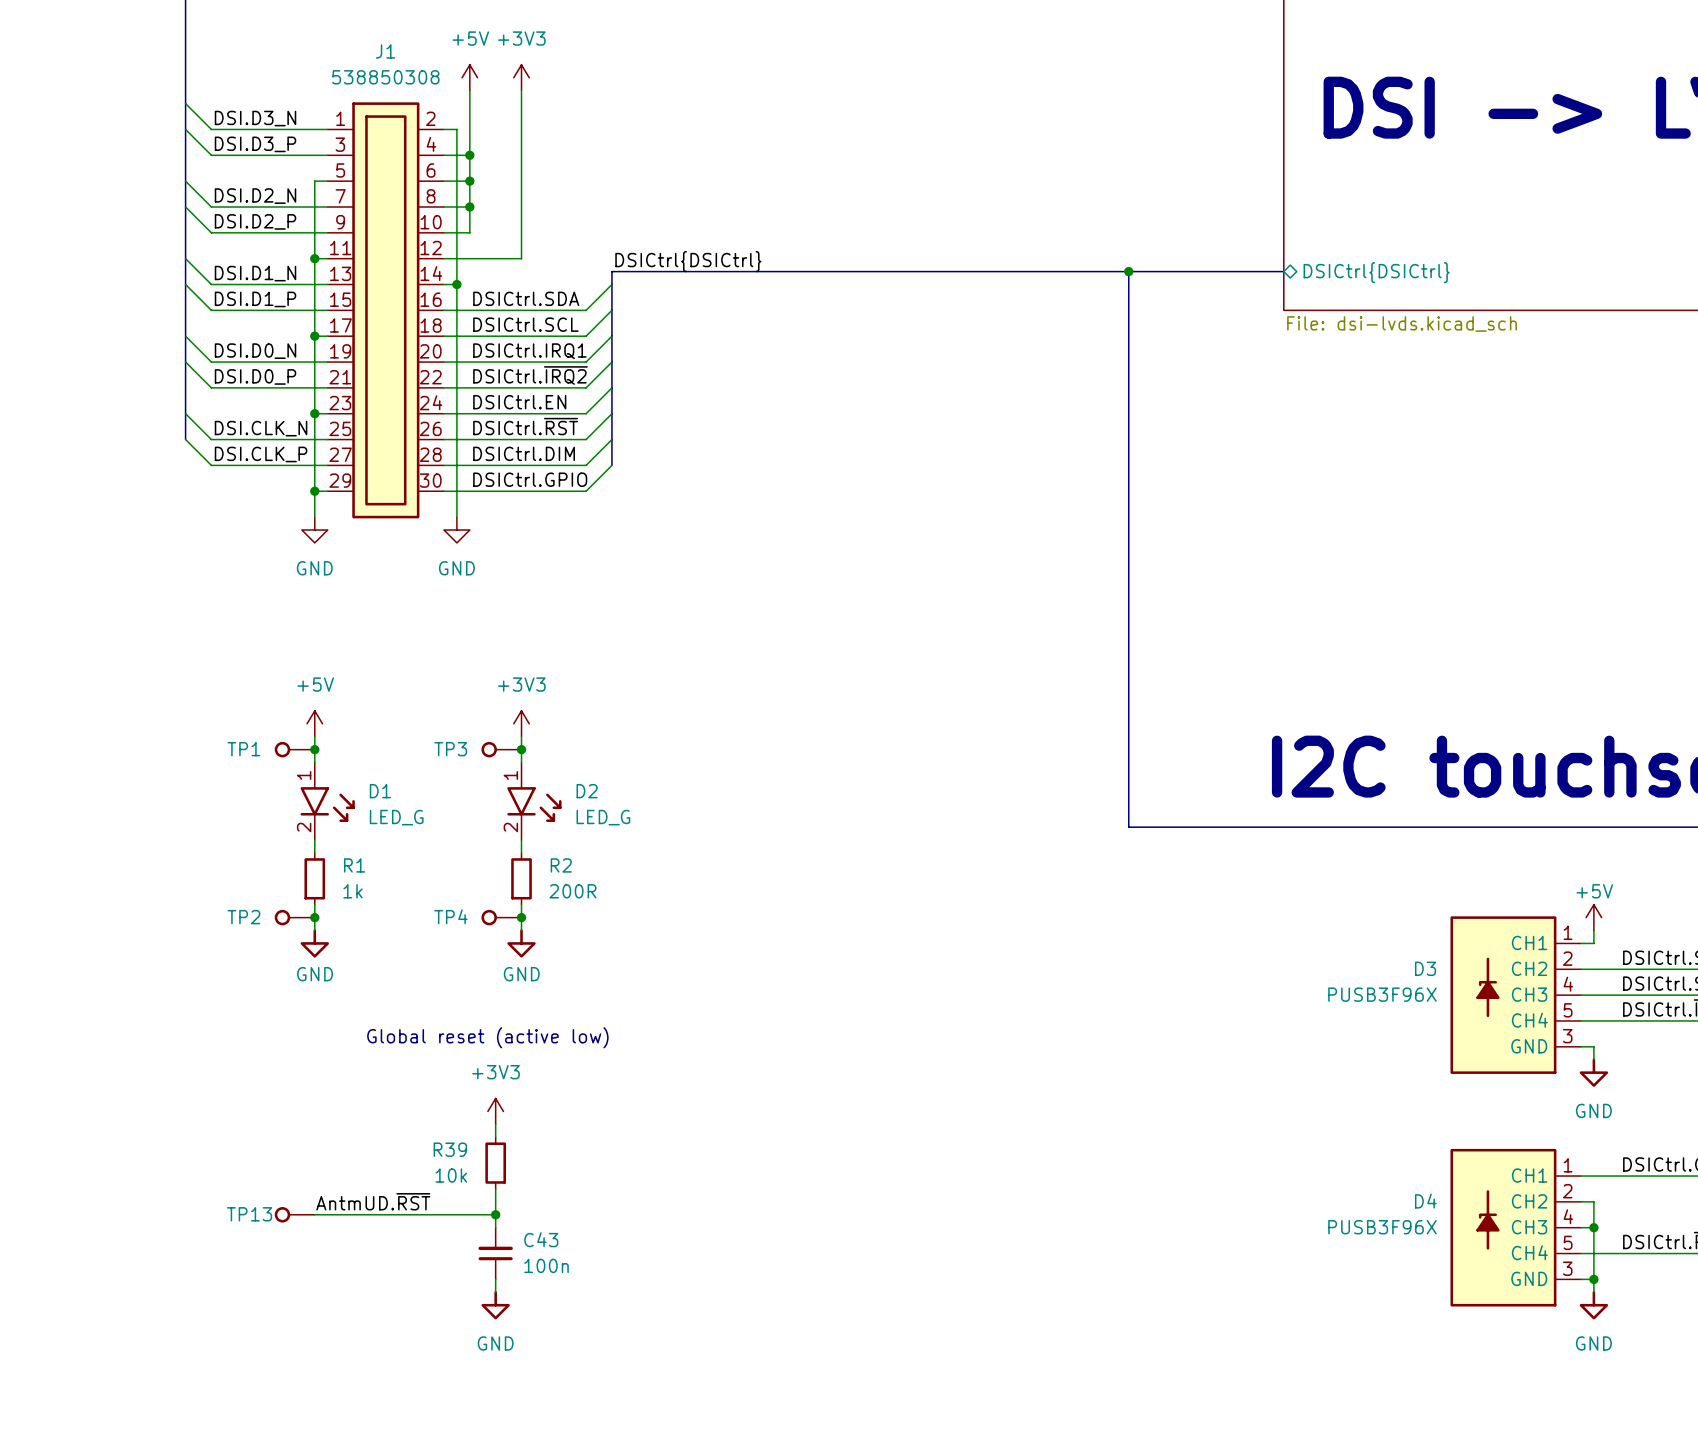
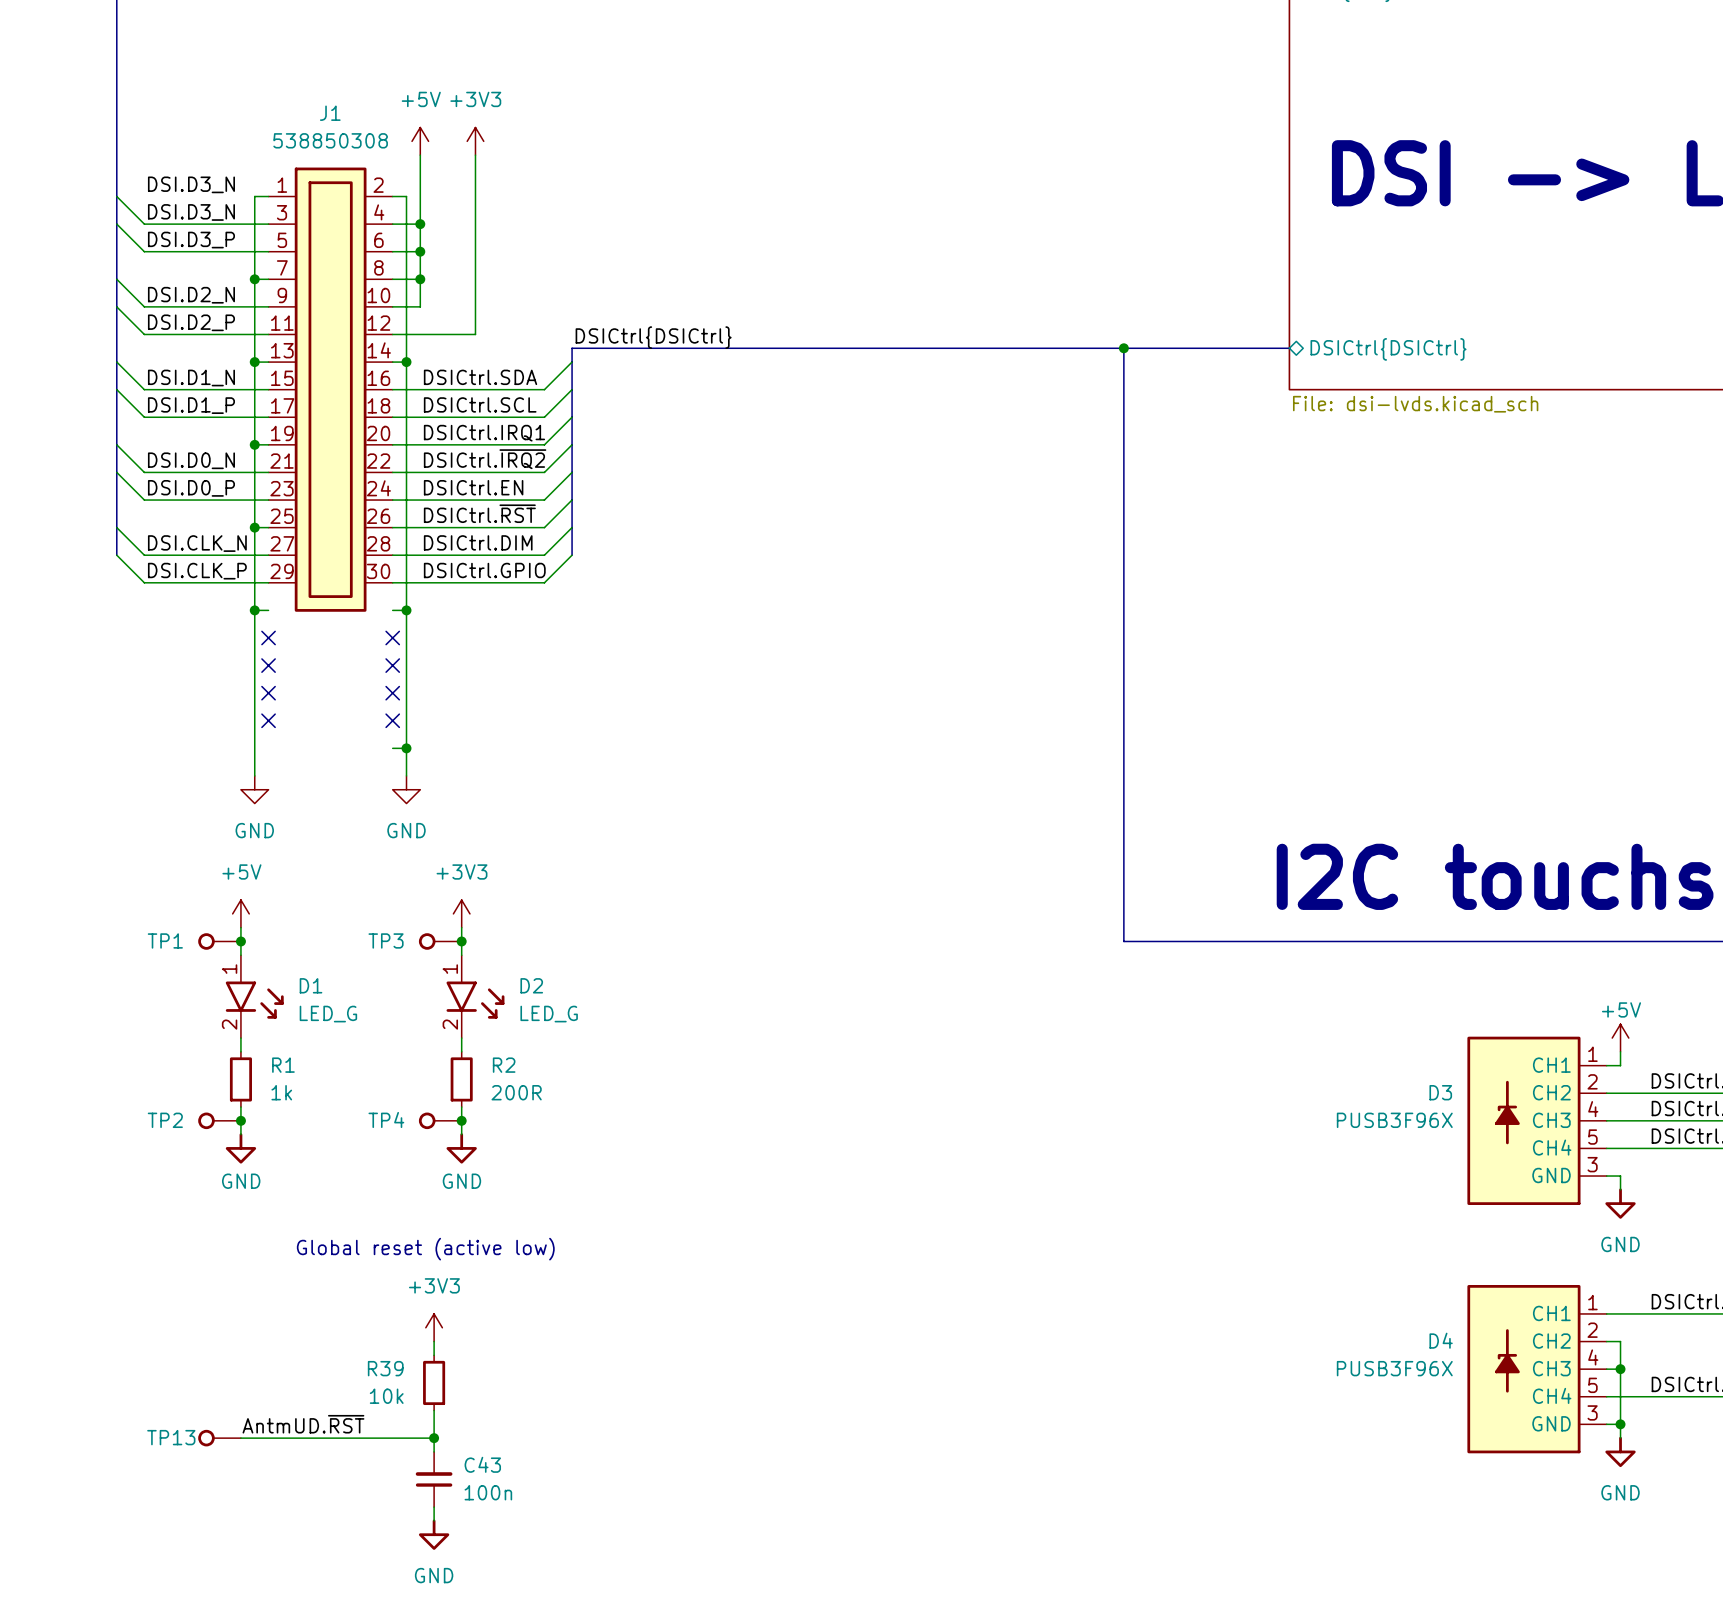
wire: (185, 103) (211, 129) (314, 129) -> (116, 224) (144, 251) (254, 251) (254, 196)
label: DSI.D3_P (255, 144) -> DSI.D3_N (191, 212)
wire: (185, 181) (211, 206) (314, 206) -> (116, 306) (144, 334) (254, 334)
label: DSI.D2_N (255, 196) -> DSI.D3_P (191, 240)
junction: none -> (254, 279)
label: DSI.D2_P (255, 221) -> DSI.D2_N (191, 295)
wire: (185, 258) (211, 284) (314, 284) -> (116, 389) (144, 417) (254, 417)
junction: (314, 258) -> none
label: DSI.D1_N (255, 273) -> DSI.D2_P (191, 322)
junction: none -> (254, 362)
label: DSI.D1_P (255, 299) -> DSI.D1_N (191, 378)
wire: (185, 336) (211, 362) (314, 362) -> (116, 472) (144, 500) (254, 500)
junction: (314, 336) -> none
label: DSI.D0_N (255, 351) -> DSI.D1_P (191, 405)
junction: none -> (254, 444)
label: DSI.D0_P (255, 376) -> DSI.D0_N (191, 460)
label: none -> DSI.D0_P (191, 488)
wire: (185, 413) (211, 439) (314, 439) -> (116, 555) (144, 582) (254, 582)
junction: (314, 413) -> none
label: DSI.CLK_N (261, 428) -> none
bus: none -> (116, 527) (116, 555)
junction: none -> (254, 527)
label: DSI.CLK_P (261, 454) -> DSI.CLK_N (197, 543)
label: none -> DSI.CLK_P (197, 571)
junction: (314, 491) -> none
junction: none -> (254, 610)
wire: none -> (268, 610) (254, 610) (254, 775)
wire: none -> (392, 610) (406, 610) (406, 775)
junction: none -> (406, 610)
power symbol: GND (314, 530) -> none
power symbol: GND (456, 530) -> none
no-connect mark: none -> (268, 637)
no-connect mark: none -> (392, 637)
no-connect mark: none -> (268, 665)
no-connect mark: none -> (392, 665)
no-connect mark: none -> (268, 693)
no-connect mark: none -> (392, 693)
no-connect mark: none -> (268, 720)
no-connect mark: none -> (392, 720)
wire: none -> (392, 748) (406, 748)
junction: none -> (406, 748)
power symbol: none -> GND (254, 789)
power symbol: none -> GND (406, 789)
power symbol position: +5V (314, 723) -> +5V (240, 913)
power symbol position: +3V3 (521, 723) -> +3V3 (461, 913)
wire: (314, 736) (314, 762) -> (240, 927) (240, 955)
wire: (521, 736) (521, 762) -> (461, 927) (461, 955)
TP1 position: (294, 749) -> (219, 941)
junction: (314, 749) -> none
TP3 position: (501, 749) -> (440, 941)
junction: (521, 749) -> none
D1 position: (327, 801) -> (254, 996)
D2 position: (534, 801) -> (475, 996)
junction: none -> (240, 941)
junction: none -> (461, 941)
wire: (314, 840) (314, 853) -> (240, 1038) (240, 1051)
wire: (521, 840) (521, 853) -> (461, 1038) (461, 1051)
R1 position: (314, 878) -> (240, 1079)
R2 position: (521, 878) -> (461, 1079)
wire: (314, 904) (314, 930) -> (240, 1107) (240, 1134)
wire: (521, 904) (521, 930) -> (461, 1107) (461, 1134)
TP2 position: (294, 917) -> (219, 1120)
junction: (314, 917) -> none
TP4 position: (501, 917) -> (440, 1120)
junction: (521, 917) -> none
power symbol position: GND (314, 943) -> GND (240, 1148)
power symbol position: GND (521, 943) -> GND (461, 1148)
junction: none -> (240, 1120)
junction: none -> (461, 1120)
text position: Global reset (active low) (487, 1037) -> Global reset (active low) (425, 1249)
power symbol position: +3V3 (495, 1111) -> +3V3 (434, 1327)
wire: (495, 1124) (495, 1137) -> (434, 1341) (434, 1355)
R39 position: (495, 1163) -> (434, 1382)
wire: (495, 1188) (495, 1227) -> (434, 1410) (434, 1451)
label position: AntmUD.~{RST} (373, 1201) -> AntmUD.~{RST} (303, 1424)
TP13 position: (294, 1214) -> (219, 1438)
wire: (314, 1214) (495, 1214) -> (240, 1438) (434, 1438)
junction: (495, 1214) -> none
C43 position: (495, 1253) -> (434, 1479)
wire: (495, 1279) (495, 1292) -> (434, 1507) (434, 1520)
junction: none -> (434, 1438)
power symbol position: GND (495, 1305) -> GND (434, 1534)

